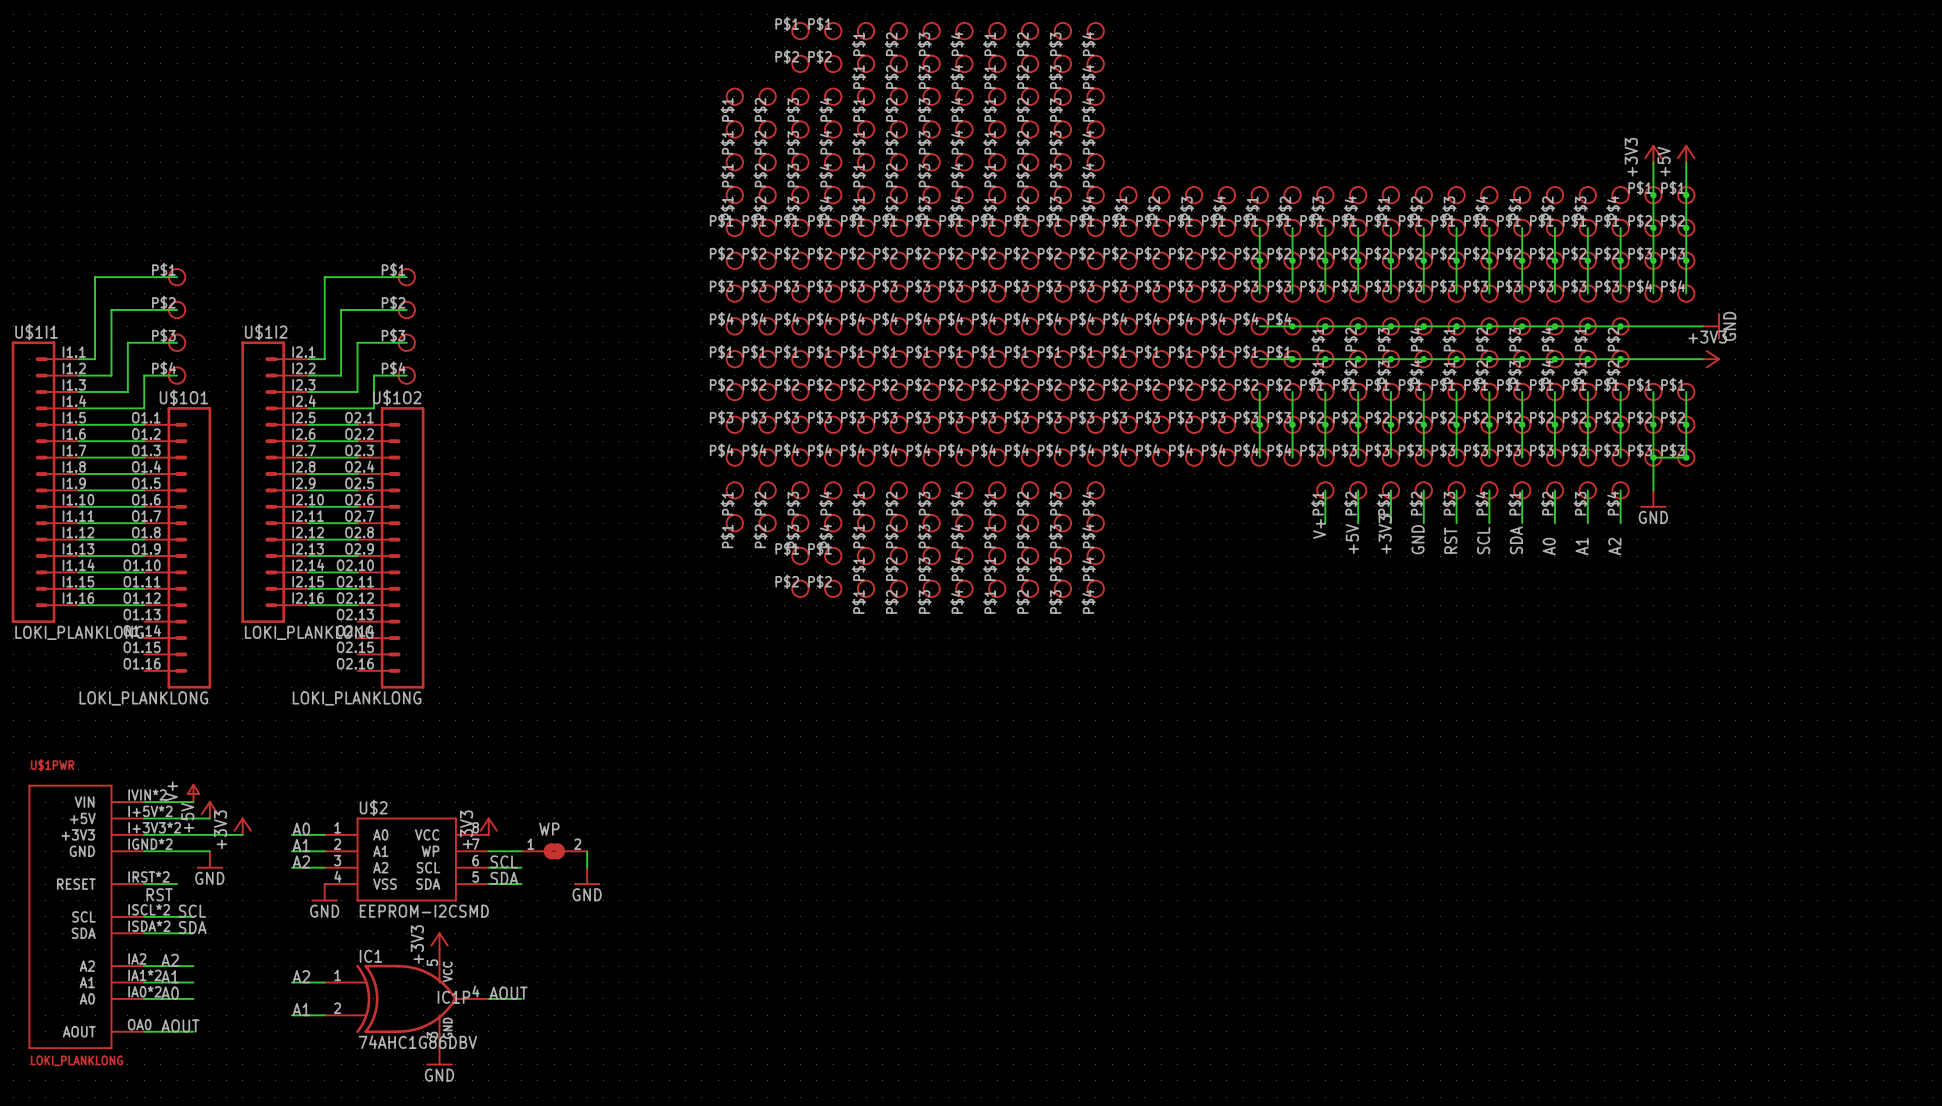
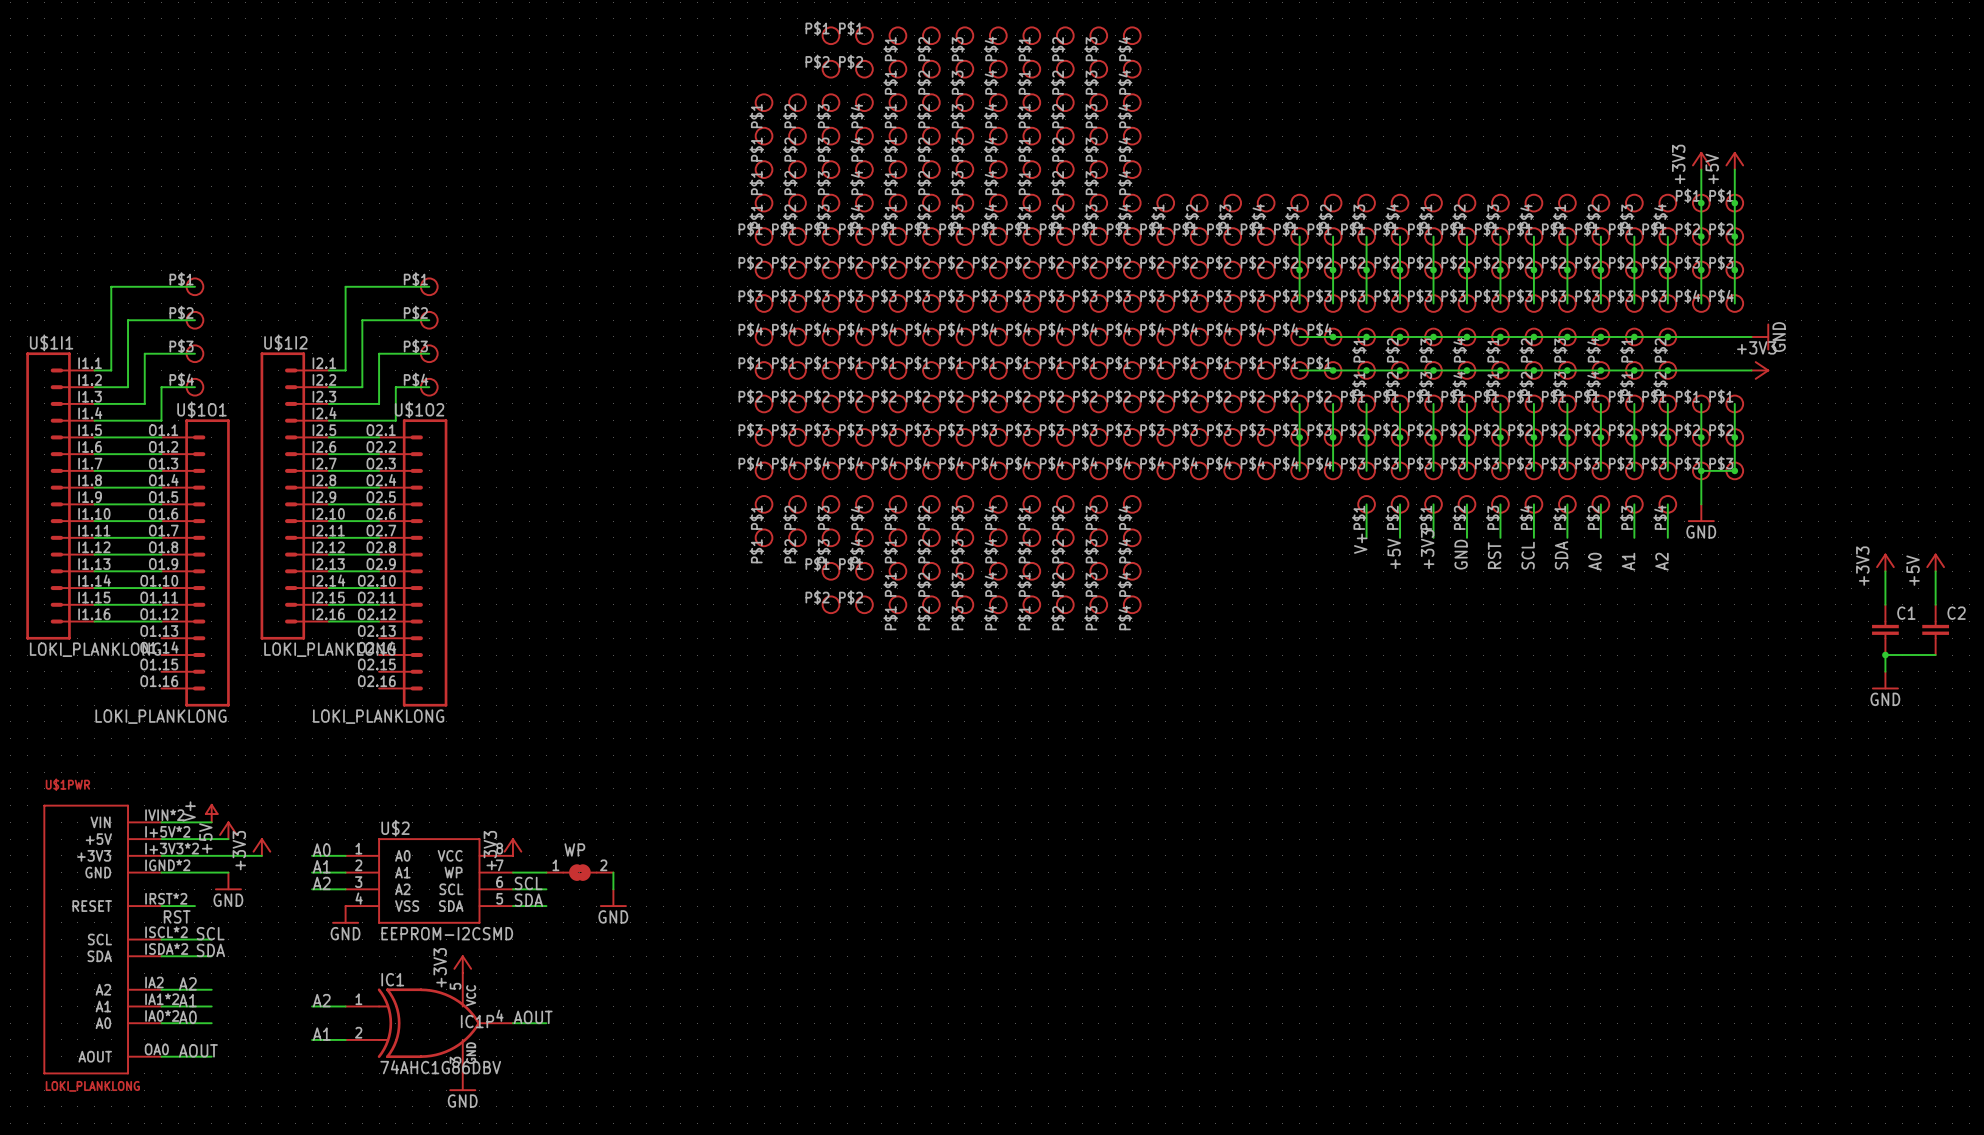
power symbol: none -> +3V3 (1885, 562)
power symbol: none -> +5V (1935, 562)
wire: none -> (1885, 571) (1885, 604)
wire: none -> (1935, 571) (1935, 604)
C1: none -> (1885, 629)
C2: none -> (1935, 629)
junction: none -> (1885, 655)
wire: none -> (1935, 655) (1885, 655) (1885, 671)
power symbol: none -> GND (1885, 680)

